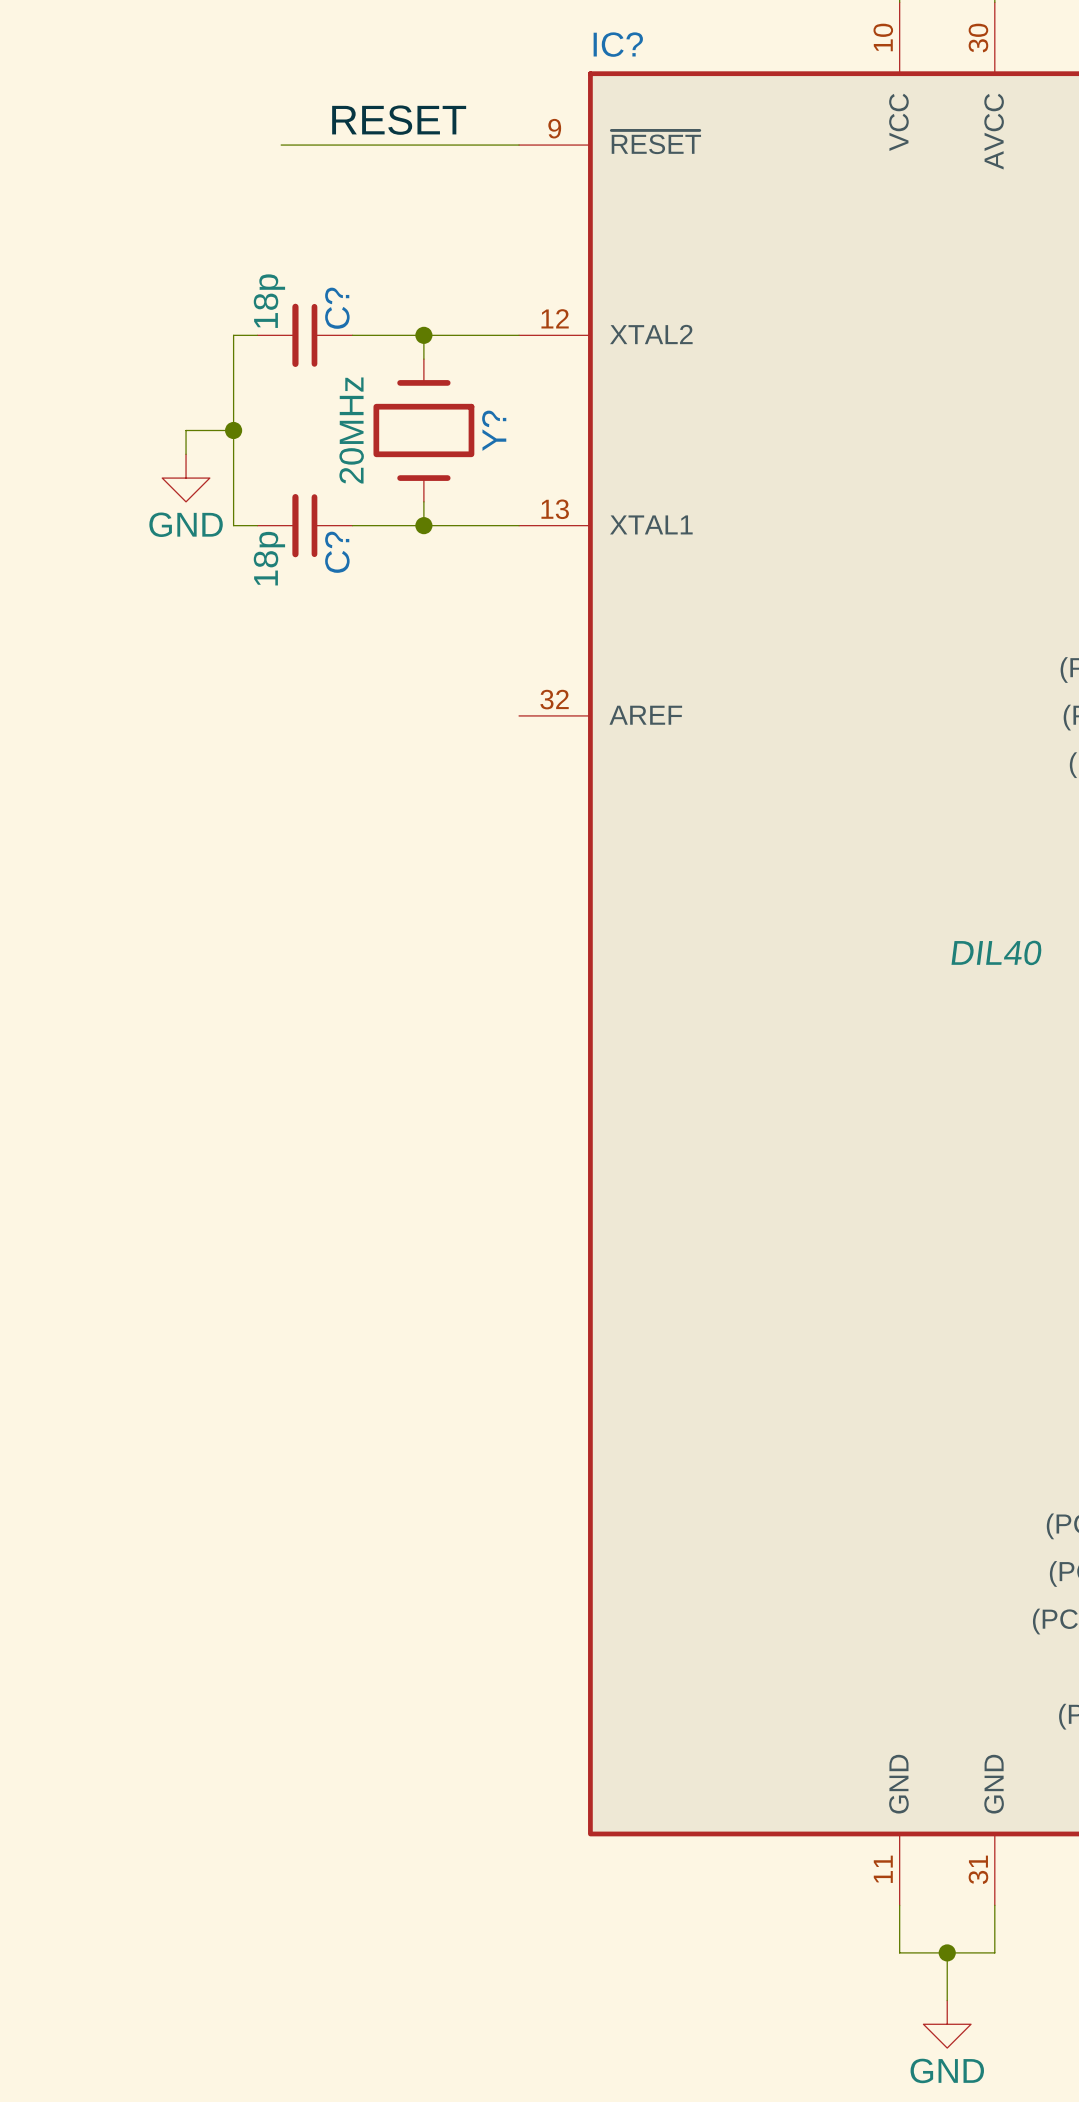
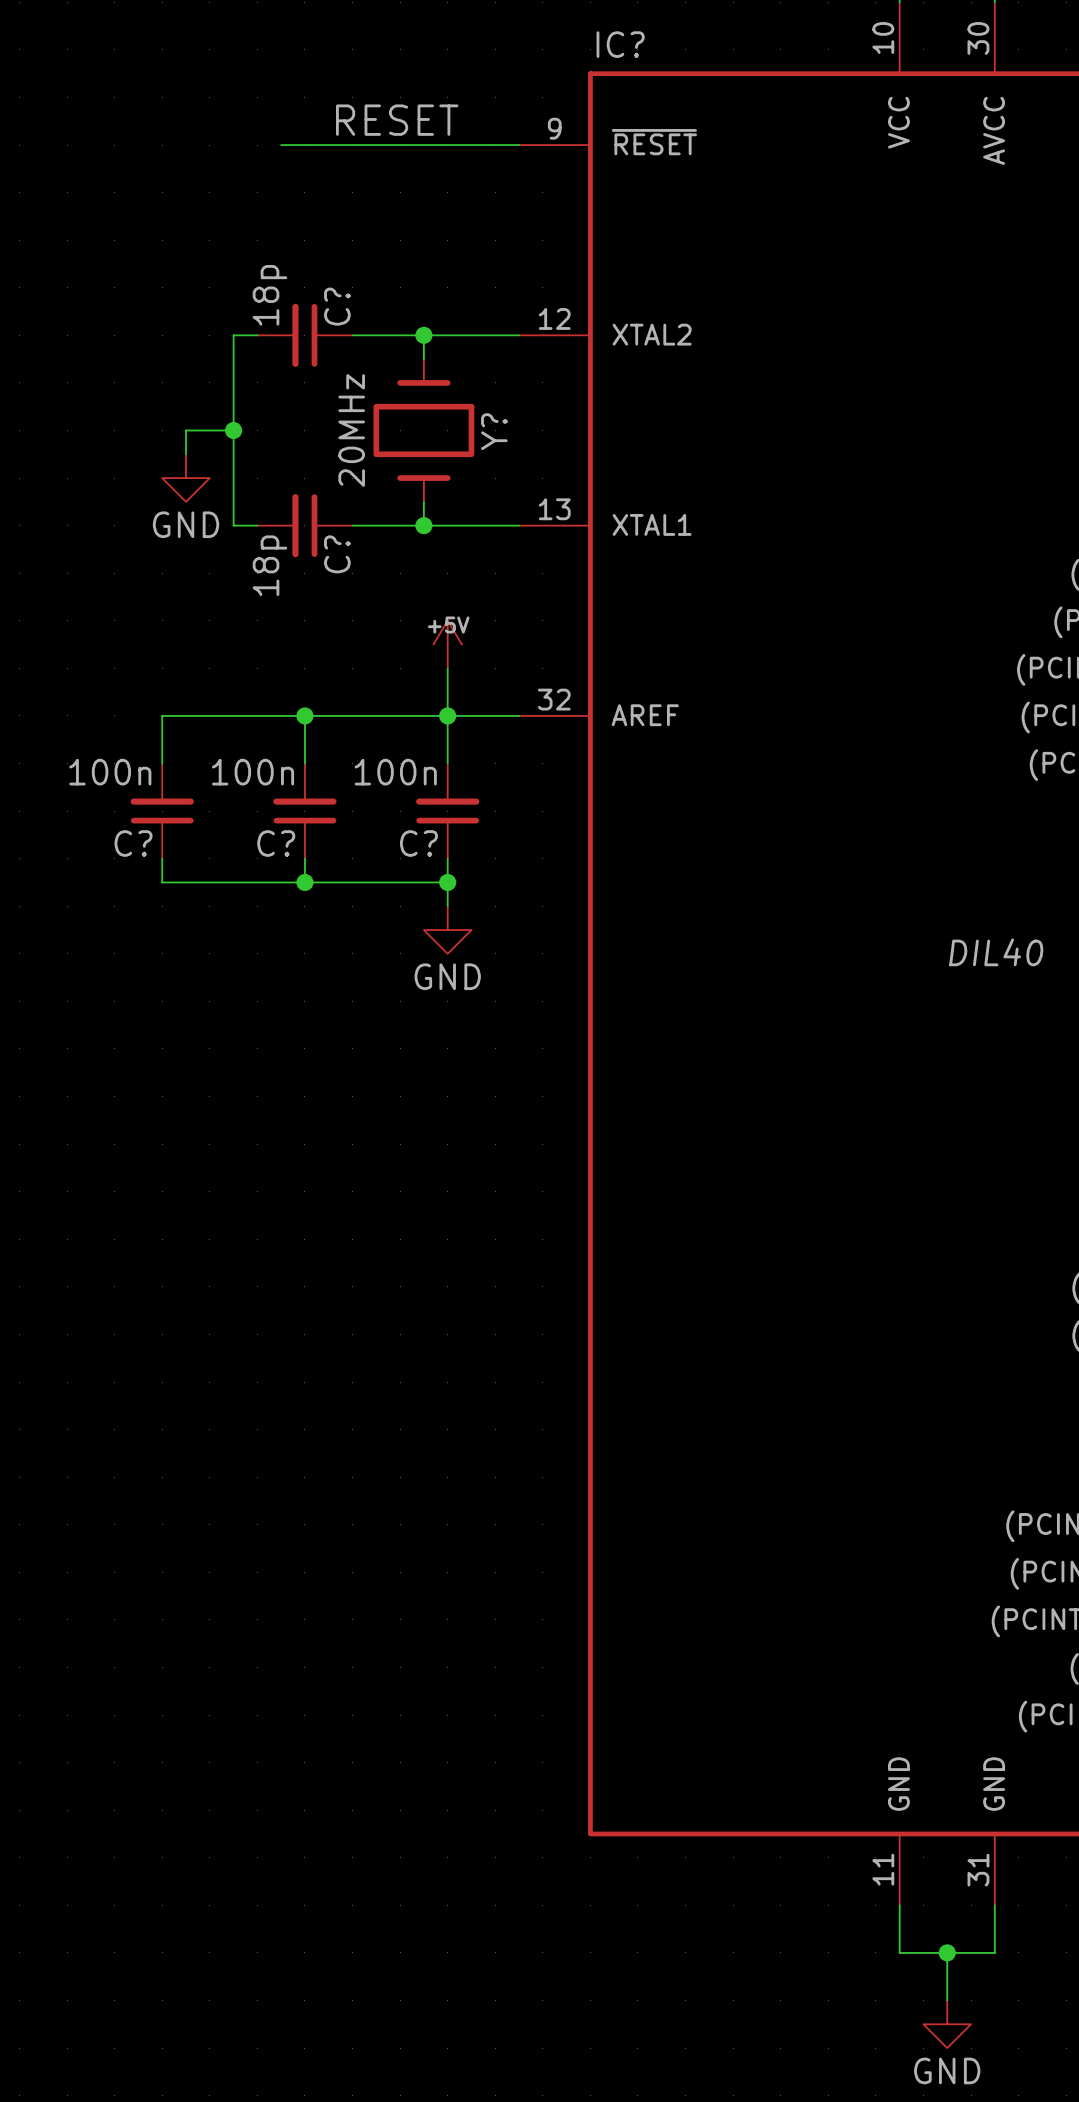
power symbol: none -> +5V (447, 644)
wire: none -> (447, 668) (447, 763)
wire: none -> (304, 715) (304, 763)
junction: none -> (304, 715)
junction: none -> (447, 715)
wire: none -> (519, 715) (162, 715) (162, 763)
C?: none -> 100n (162, 811)
C?: none -> 100n (304, 811)
C?: none -> 100n (447, 811)
wire: none -> (162, 858) (162, 882) (447, 882)
wire: none -> (304, 858) (304, 882)
wire: none -> (447, 858) (447, 906)
junction: none -> (304, 882)
junction: none -> (447, 882)
power symbol: none -> GND (447, 930)

